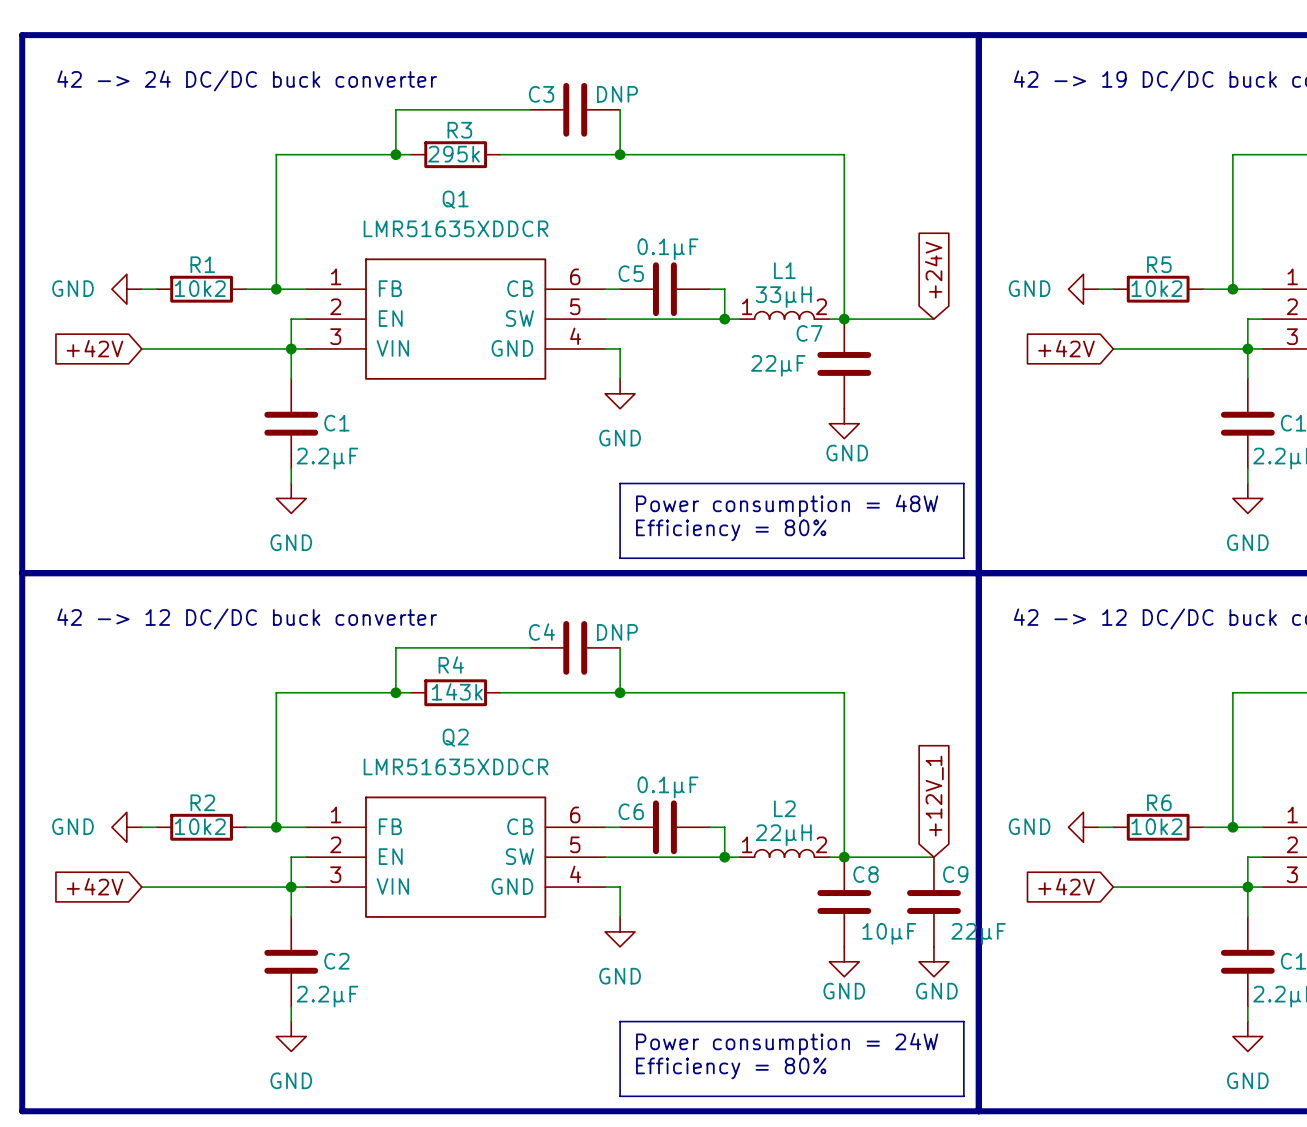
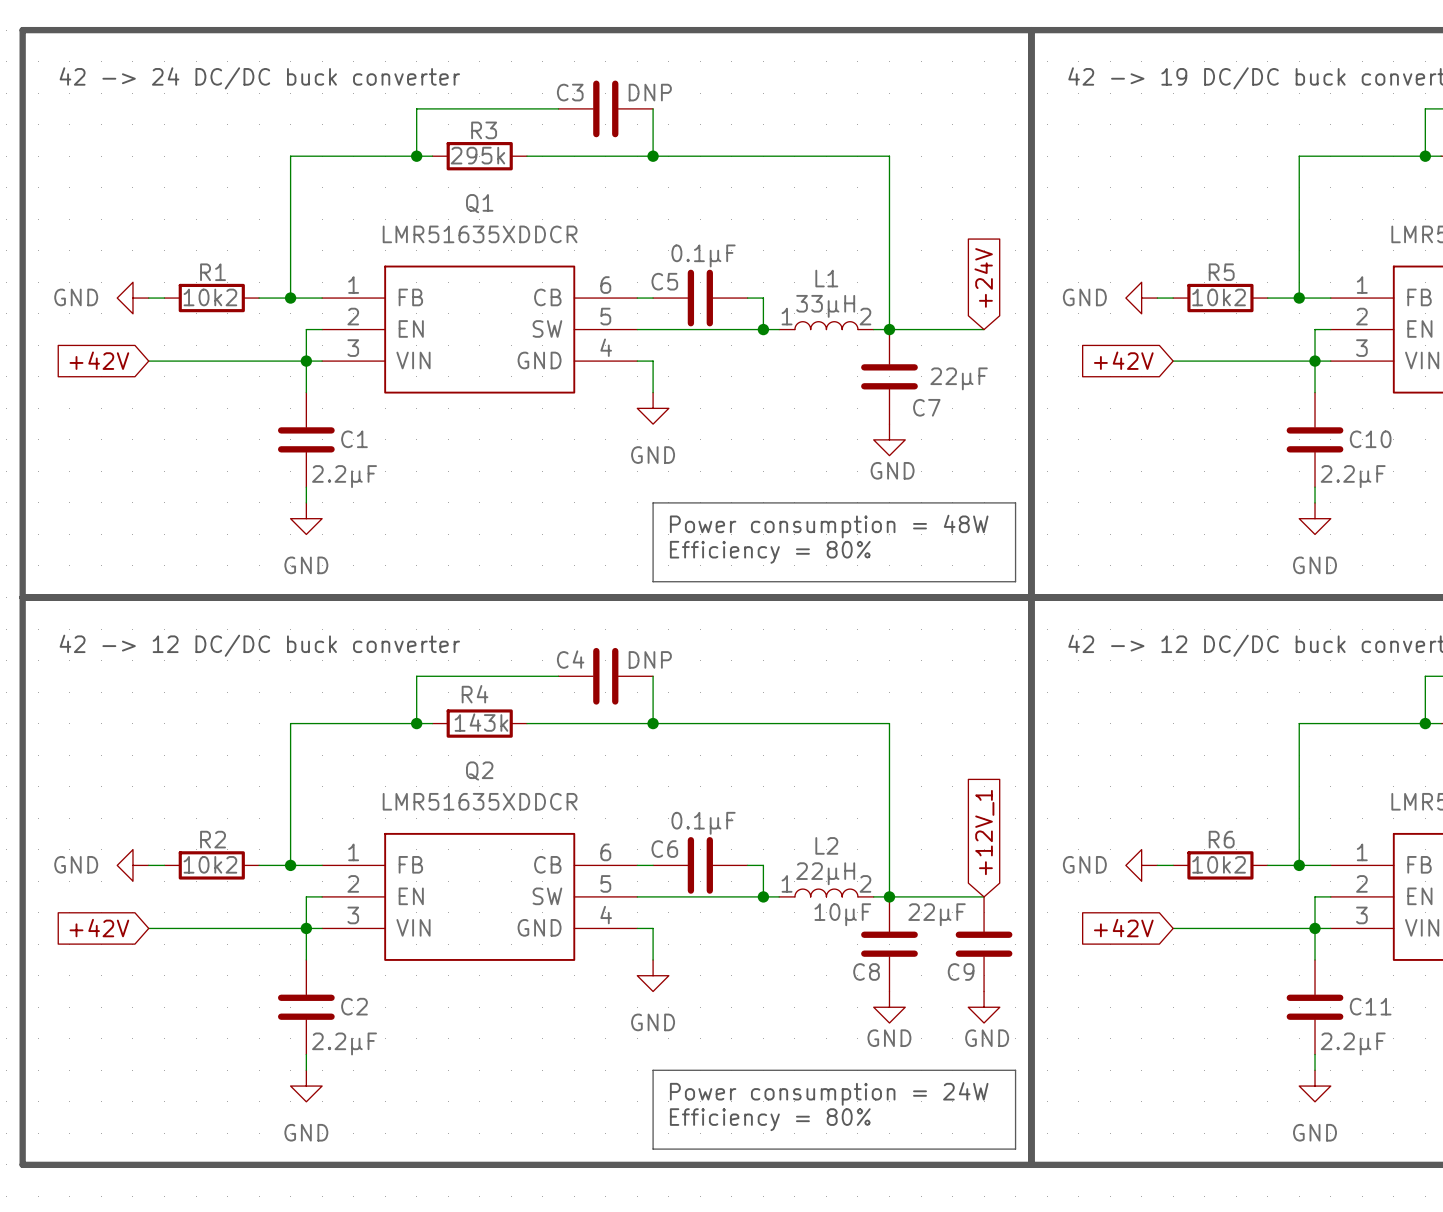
C7 name position: C7 (809, 333) -> C7 (926, 407)
C7 value position: 22µF (778, 365) -> 22µF (959, 378)
C8 name position: C8 (866, 874) -> C8 (866, 971)
C9 name position: C9 (955, 874) -> C9 (961, 971)
C8 value position: 10µF (889, 933) -> 10µF (842, 914)
C9 value position: 22µF (978, 933) -> 22µF (937, 914)

